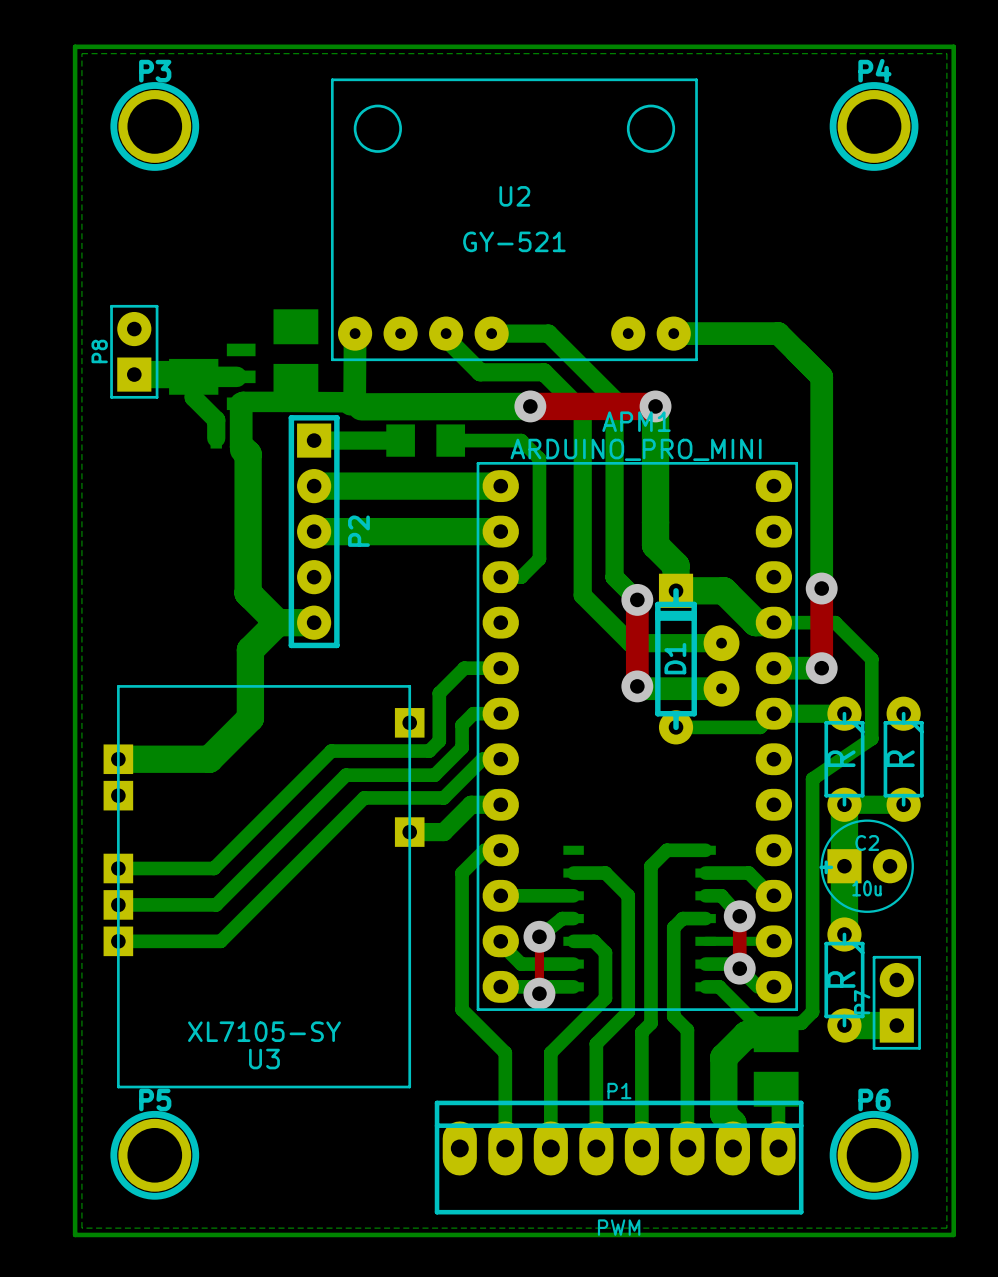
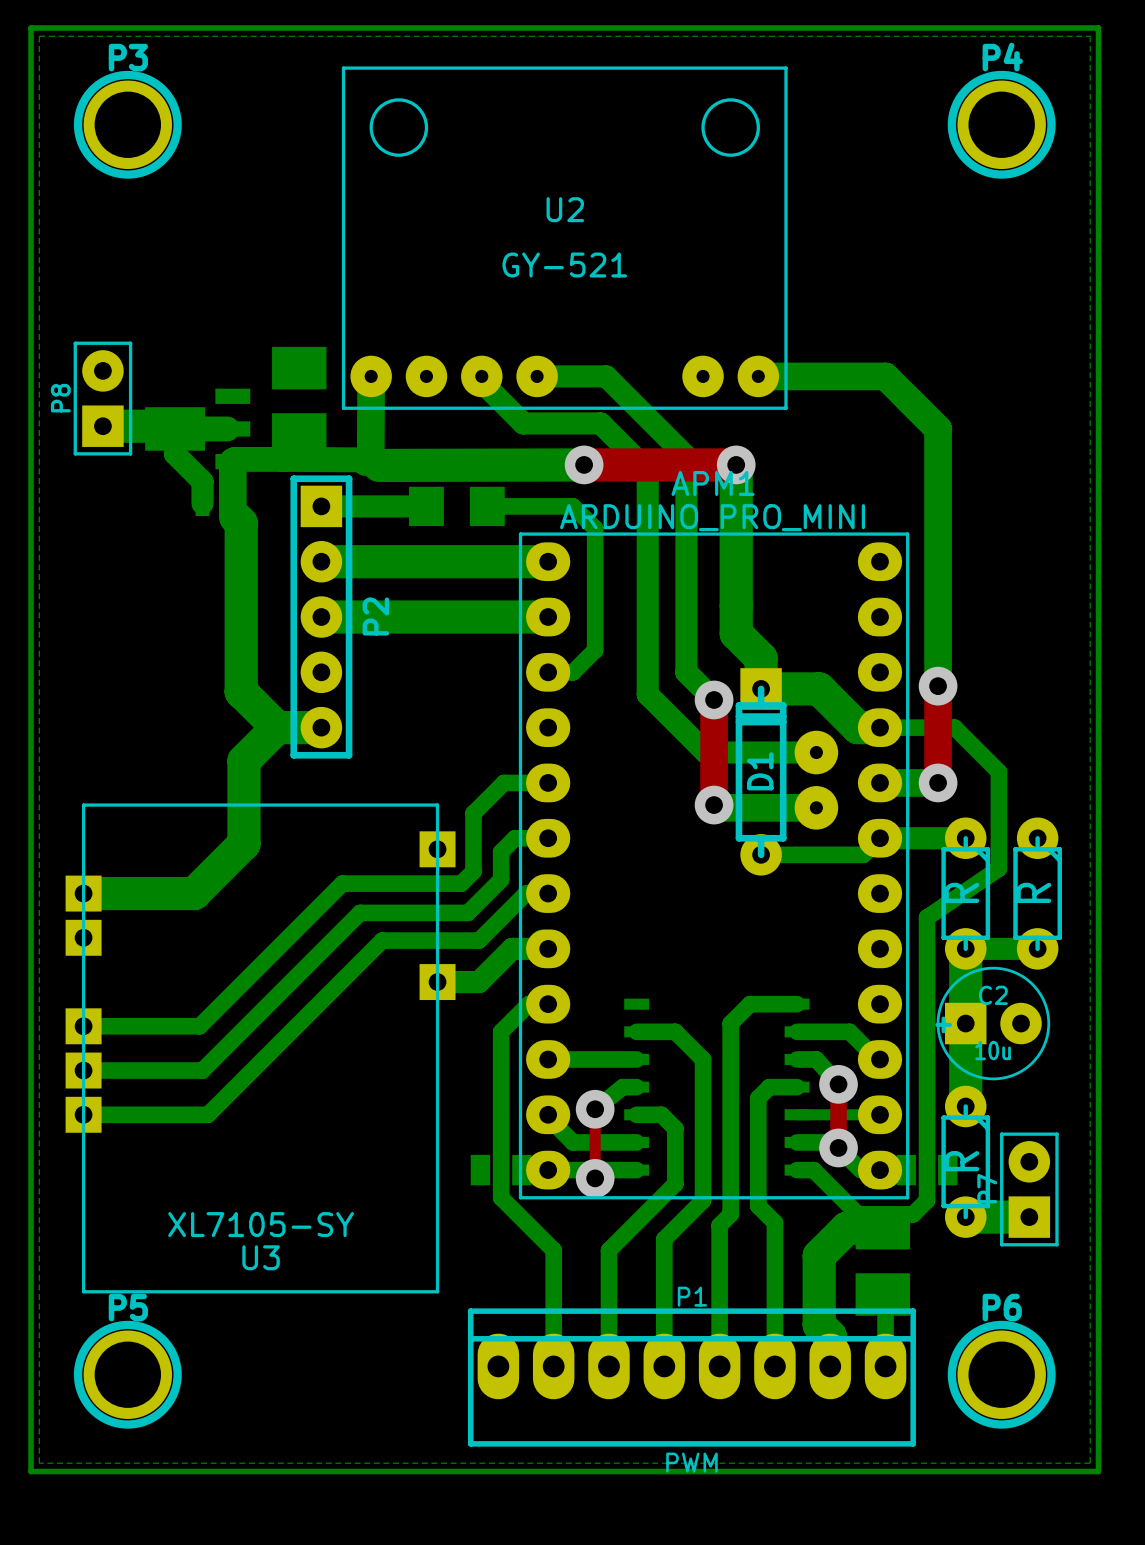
part: none -> (501, 1170)
part: none -> (927, 1170)

